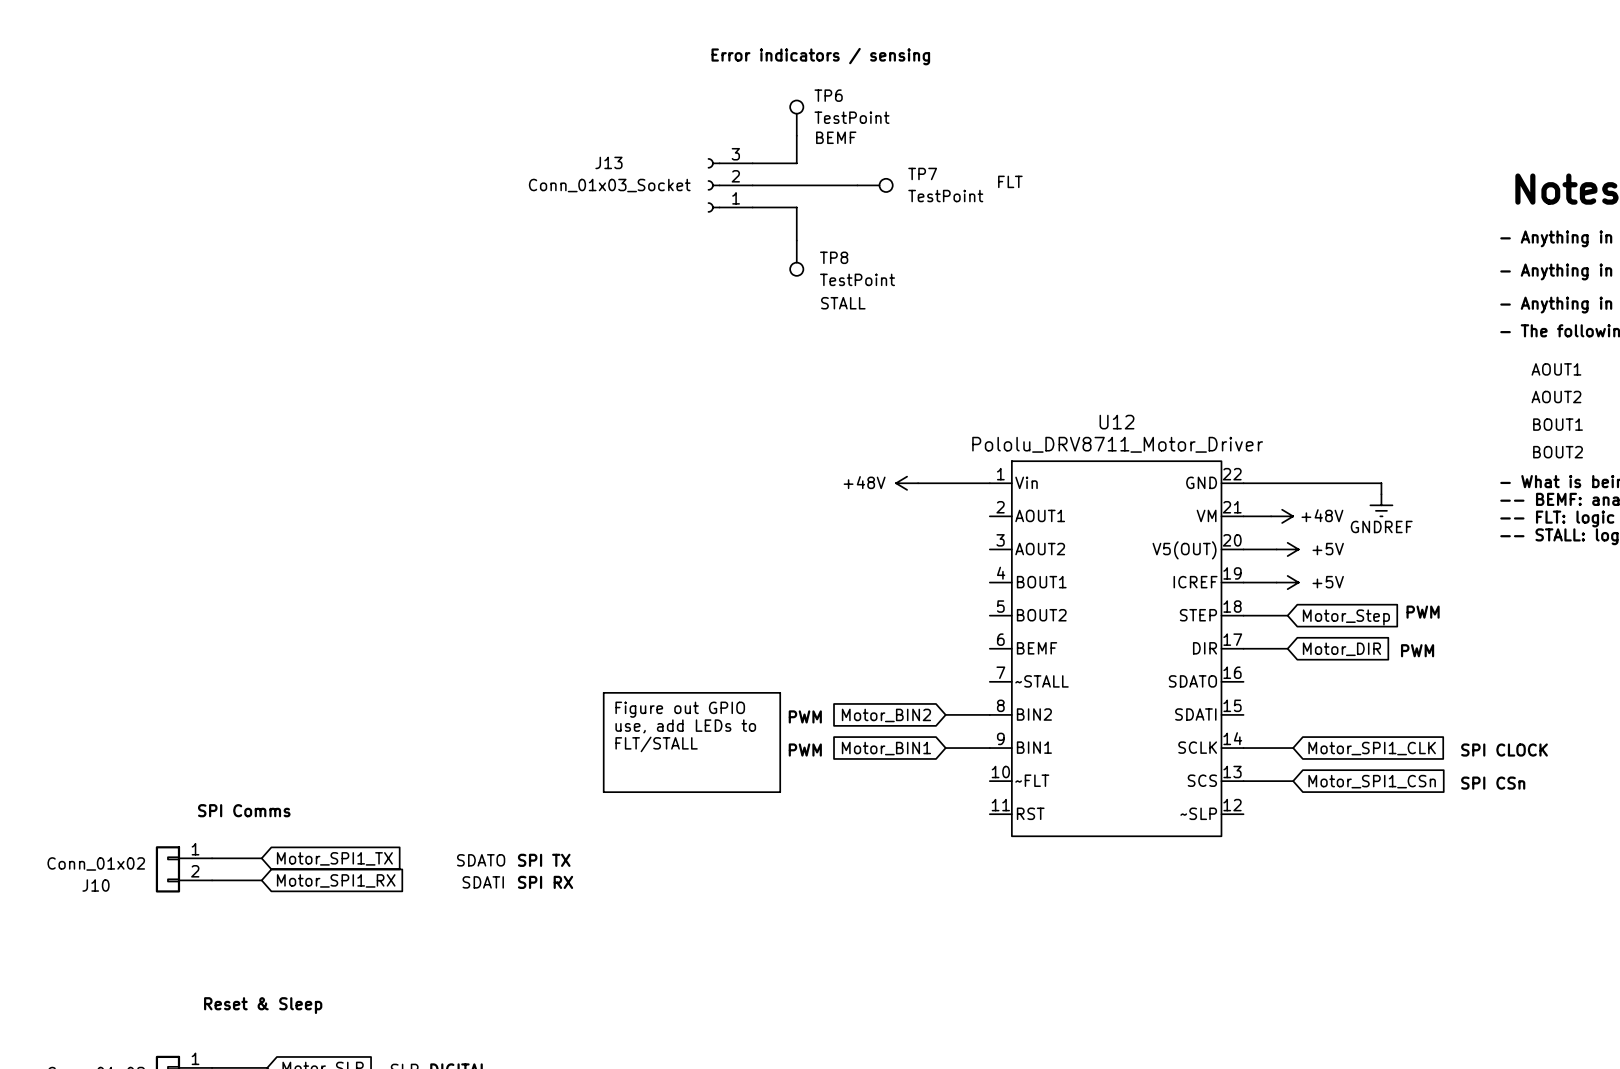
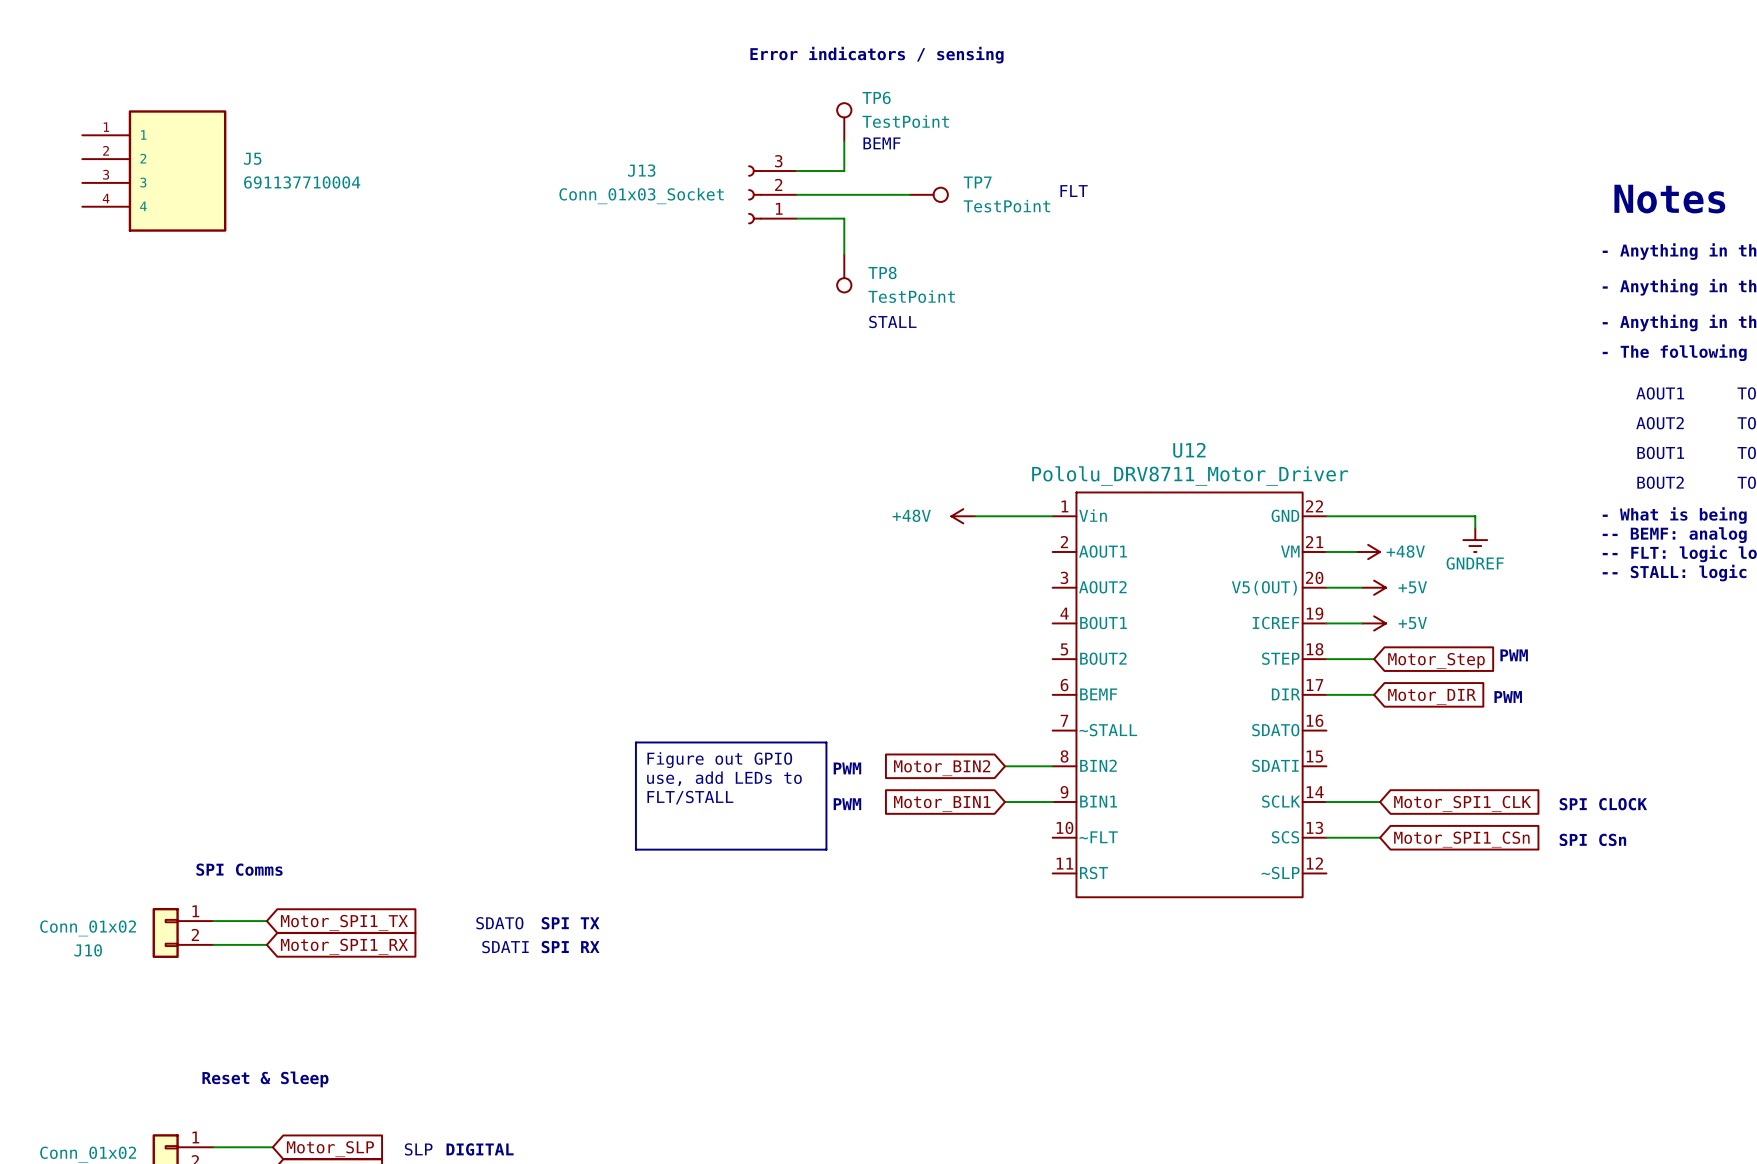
J5: none -> 691137710004 (154, 171)

